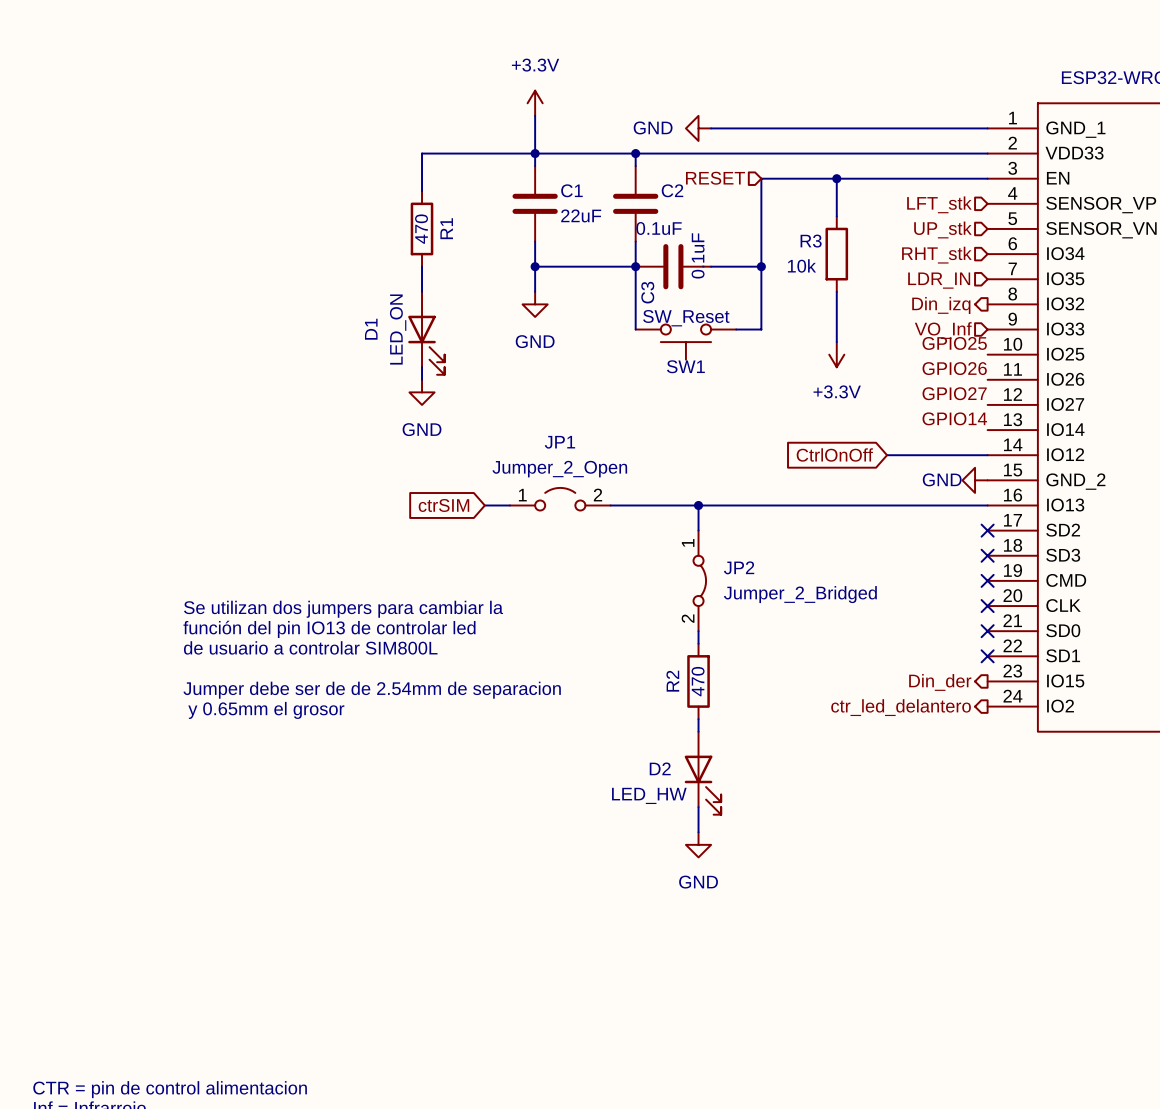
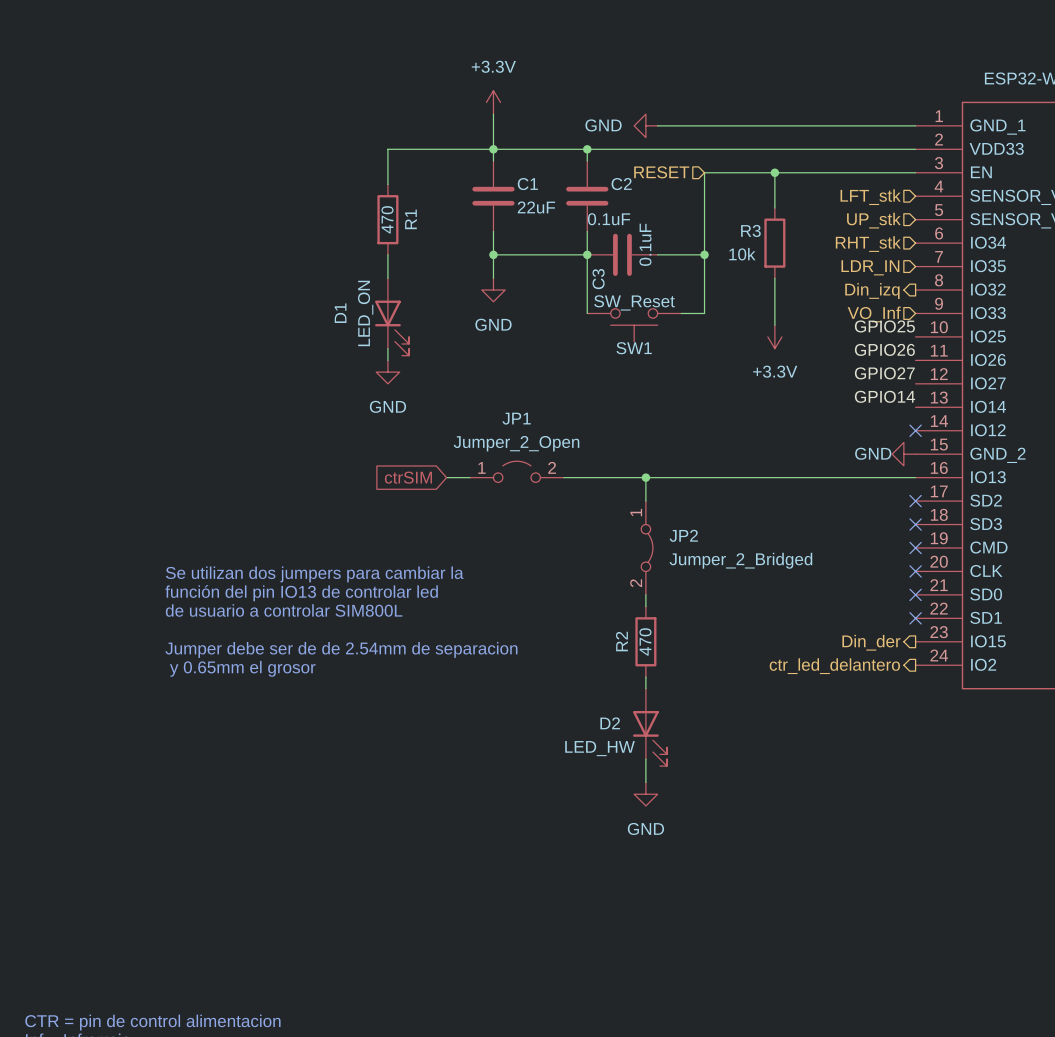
global label: CtrlOnOff (834, 454) -> none
wire: (887, 455) (987, 455) -> none
no-connect mark: none -> (915, 430)

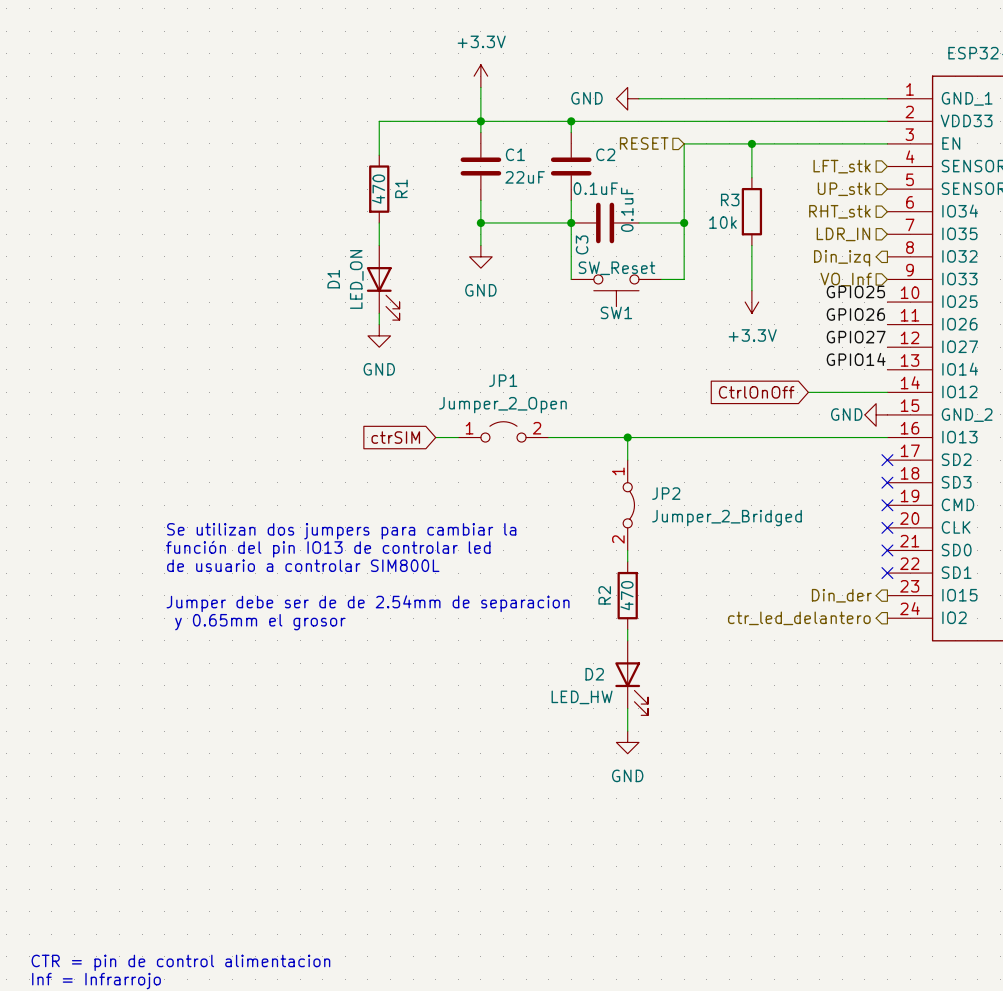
global label: none -> CtrlOnOff (756, 392)
wire: none -> (808, 392) (887, 392)
no-connect mark: (915, 430) -> none

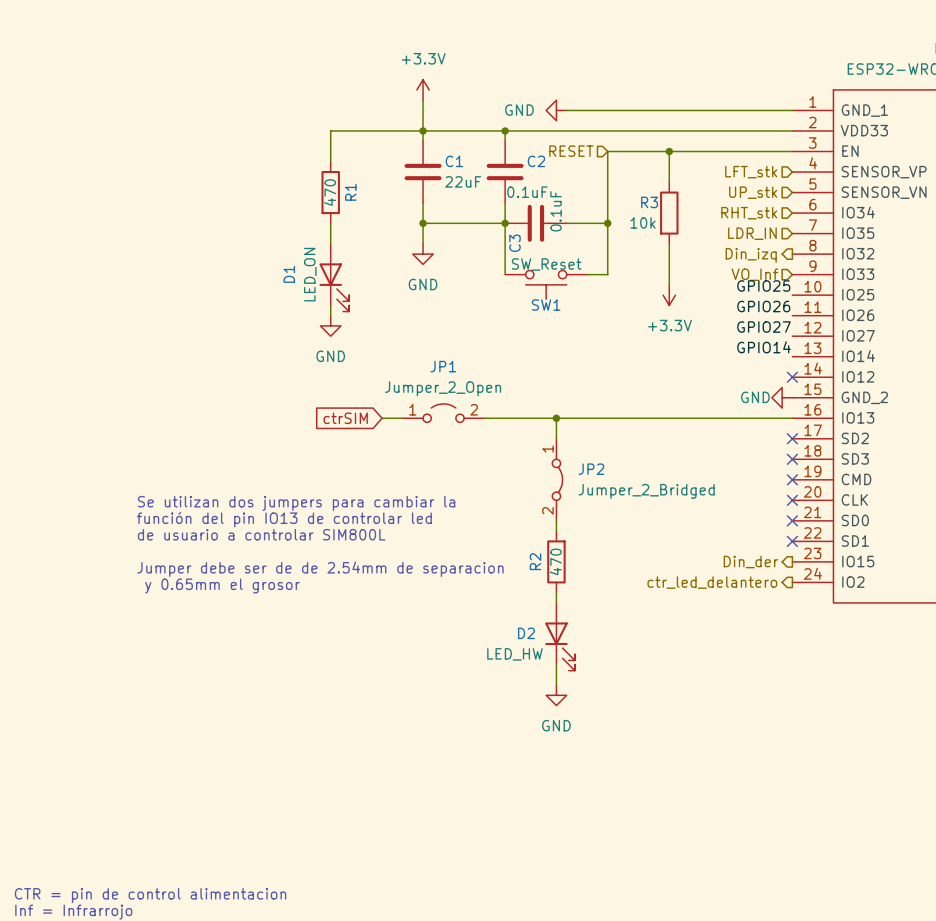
global label: CtrlOnOff (756, 392) -> none
wire: (808, 392) (887, 392) -> none
no-connect mark: none -> (792, 377)

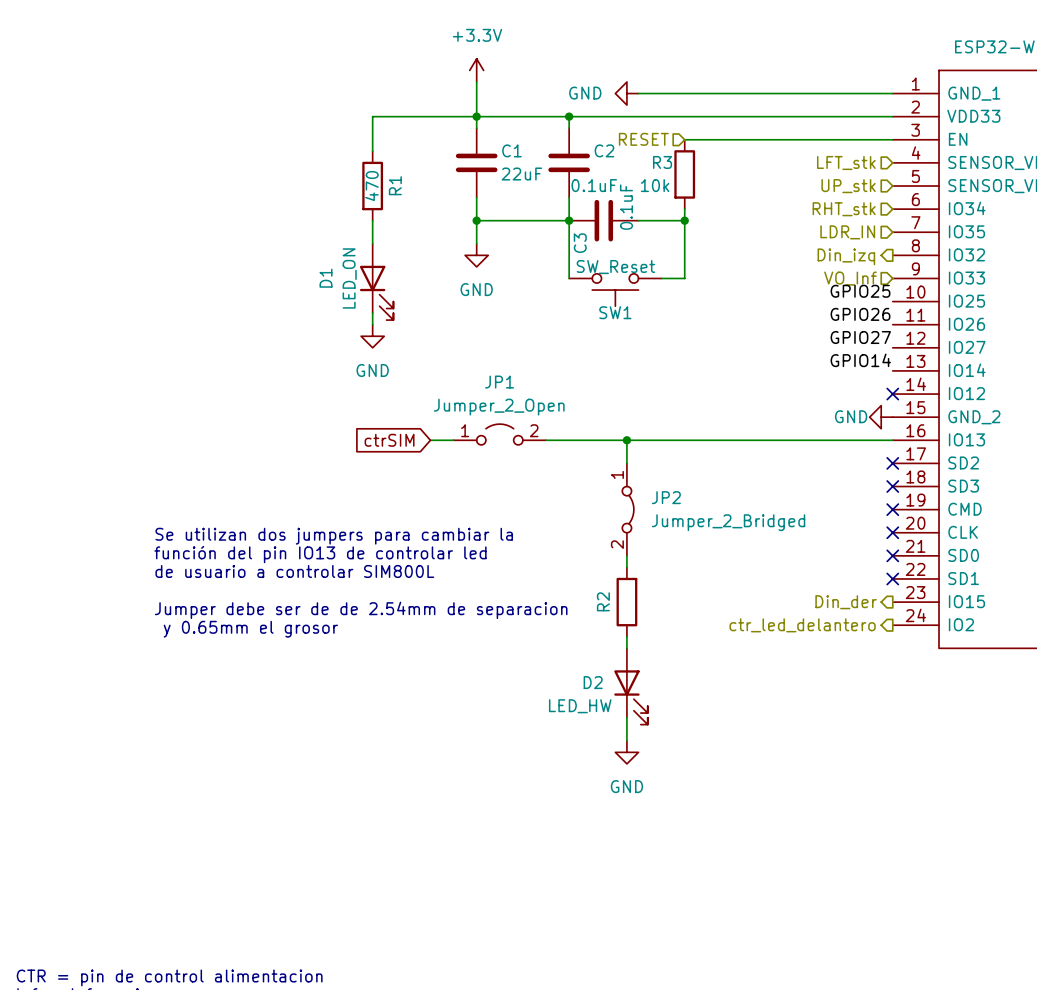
wire: (607, 151) (607, 213) -> none
wire: (669, 151) (669, 182) -> none
junction: (669, 151) -> none
R3 position: (669, 213) -> (684, 174)
wire: (669, 243) (669, 284) -> none
power symbol: +3.3V (669, 295) -> none
R2 value: 470 (555, 561) -> none

